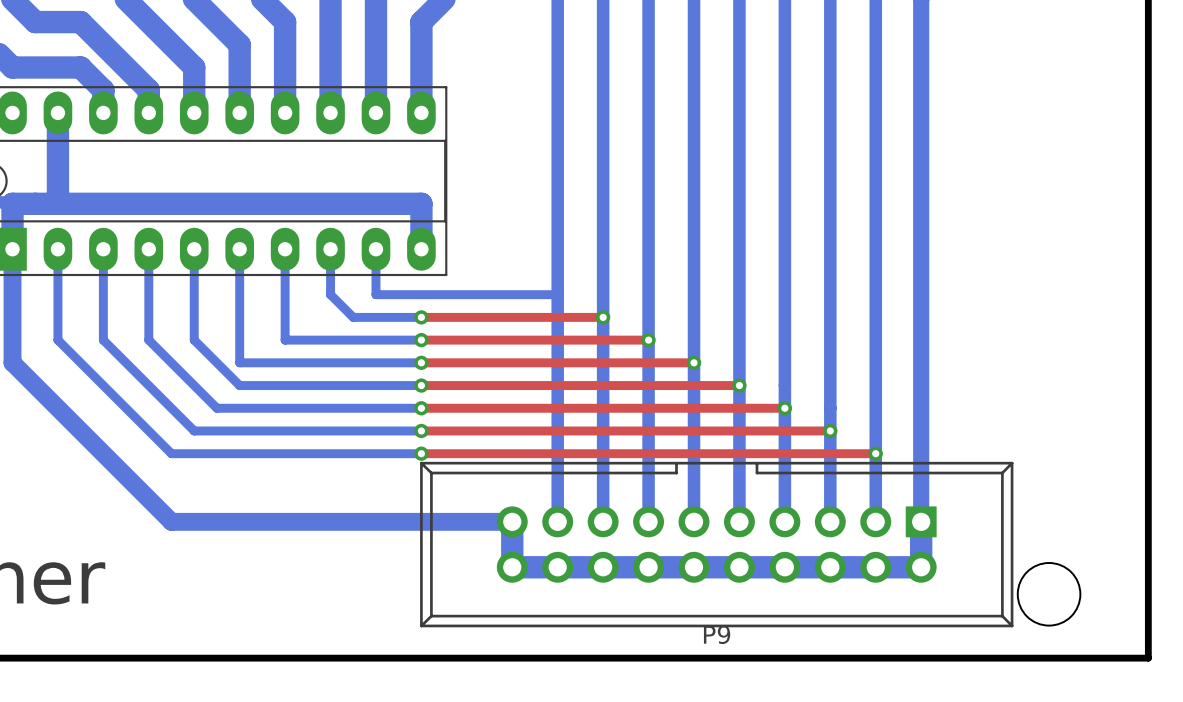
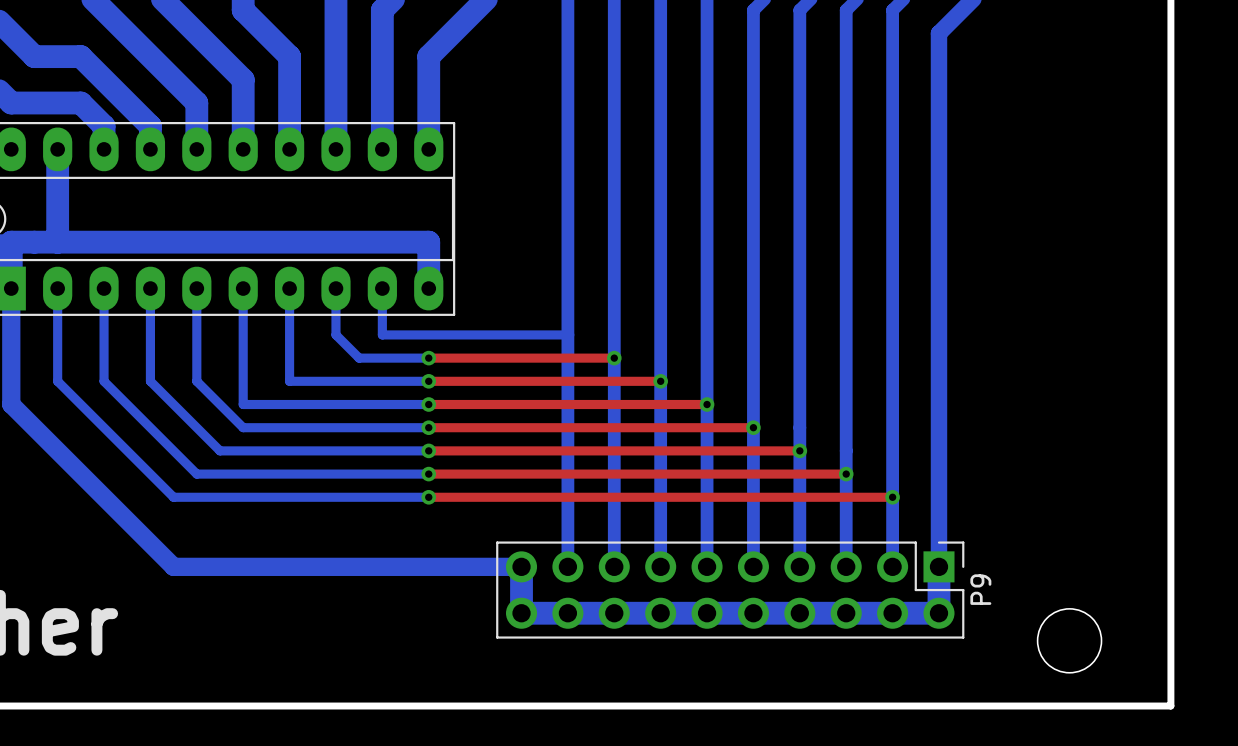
P9 footprint: [420, 461, 1014, 628] -> [496, 541, 965, 639]
P9 name position: P9 (717, 634) -> P9 (980, 589)

